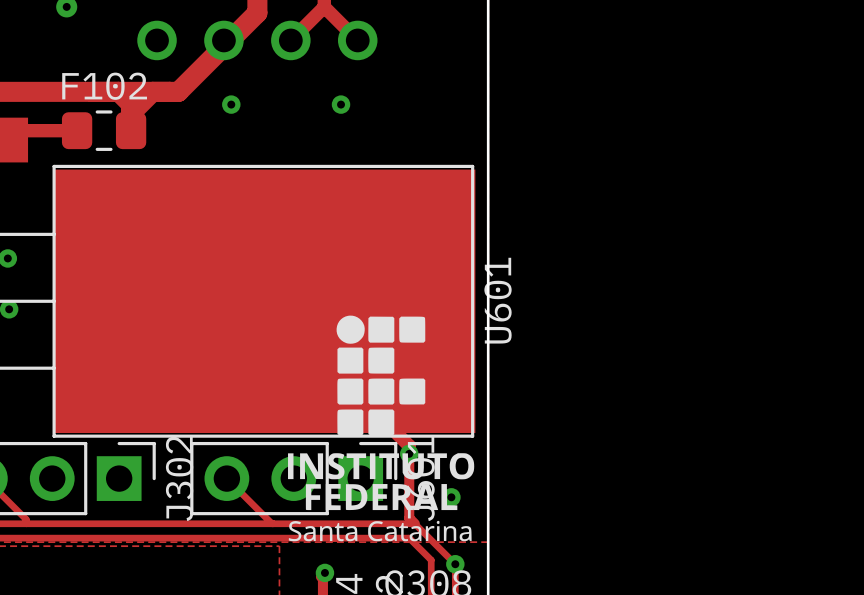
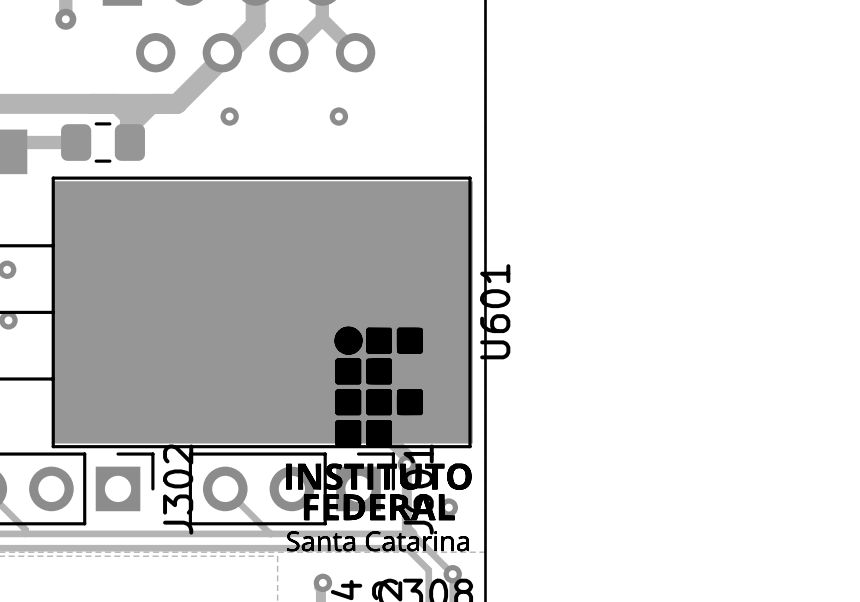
F102 name: F102 (104, 86) -> none
drawing: none -> [286, 326, 472, 552]

